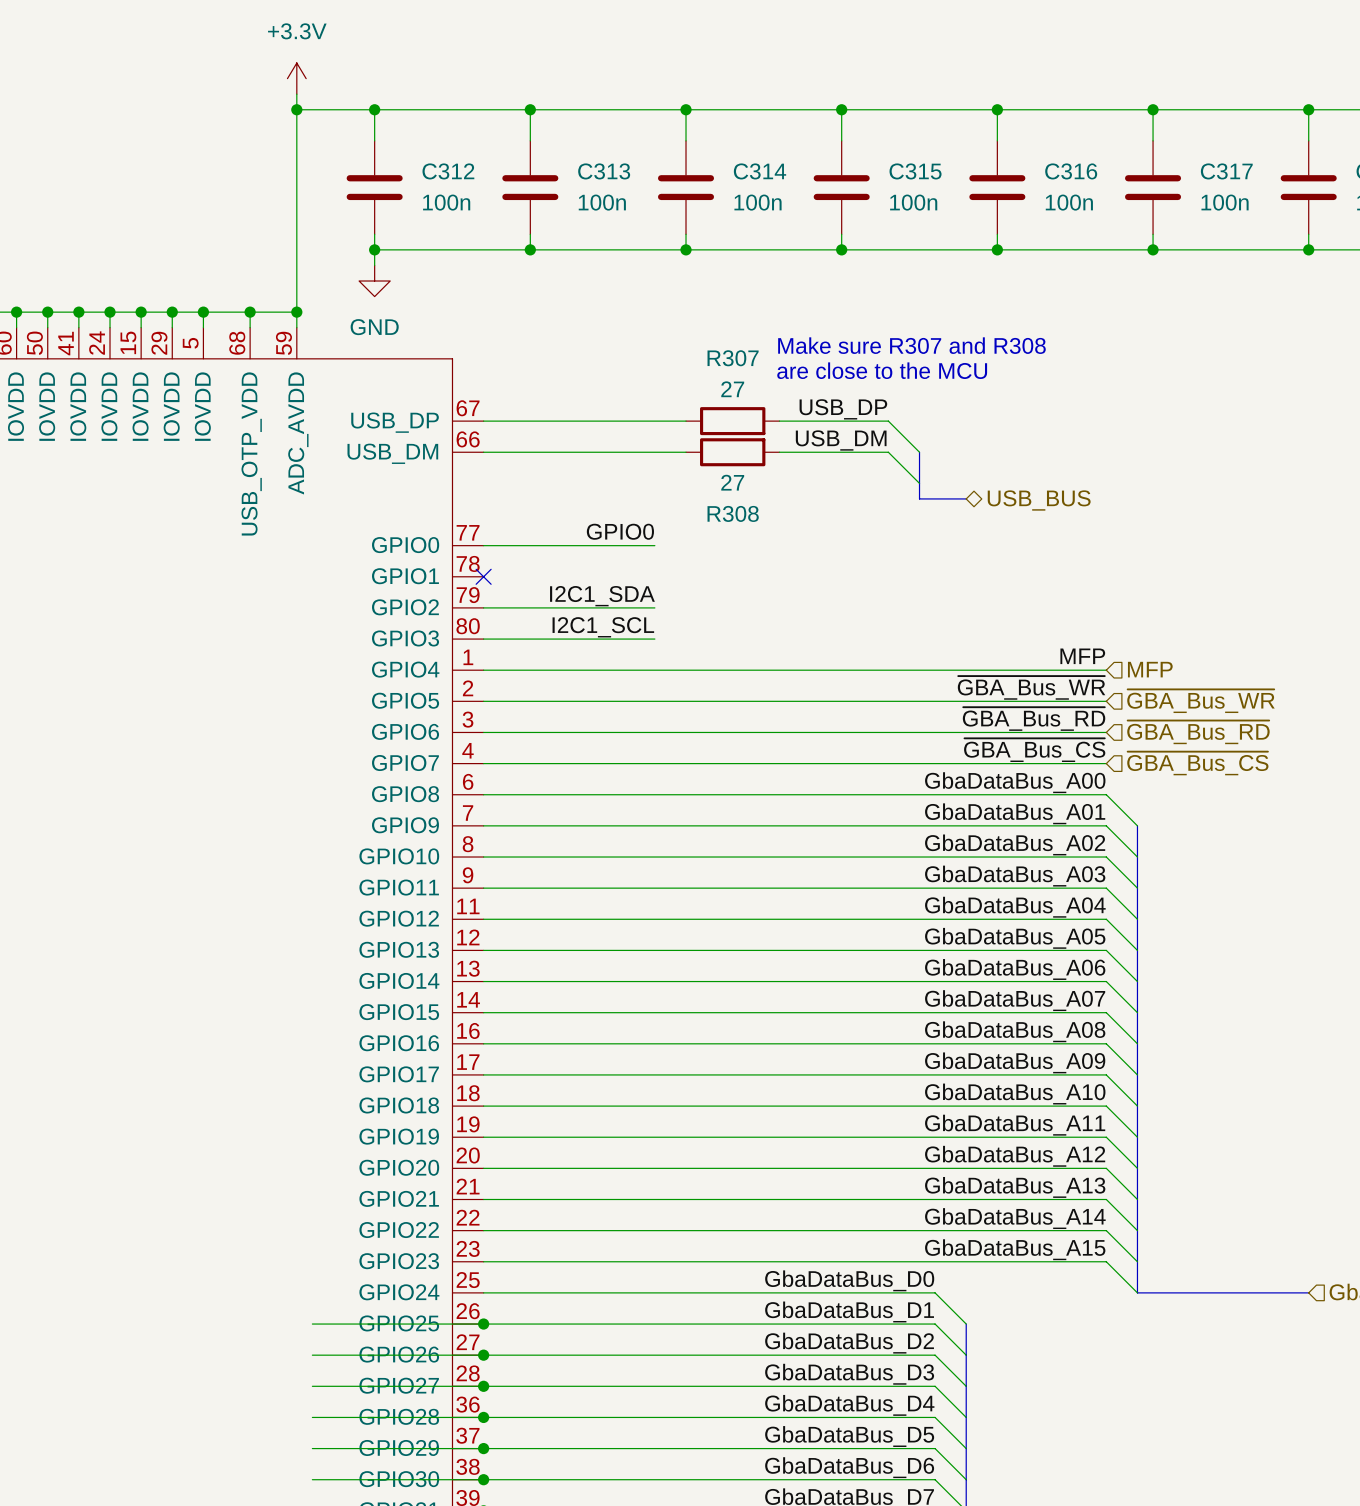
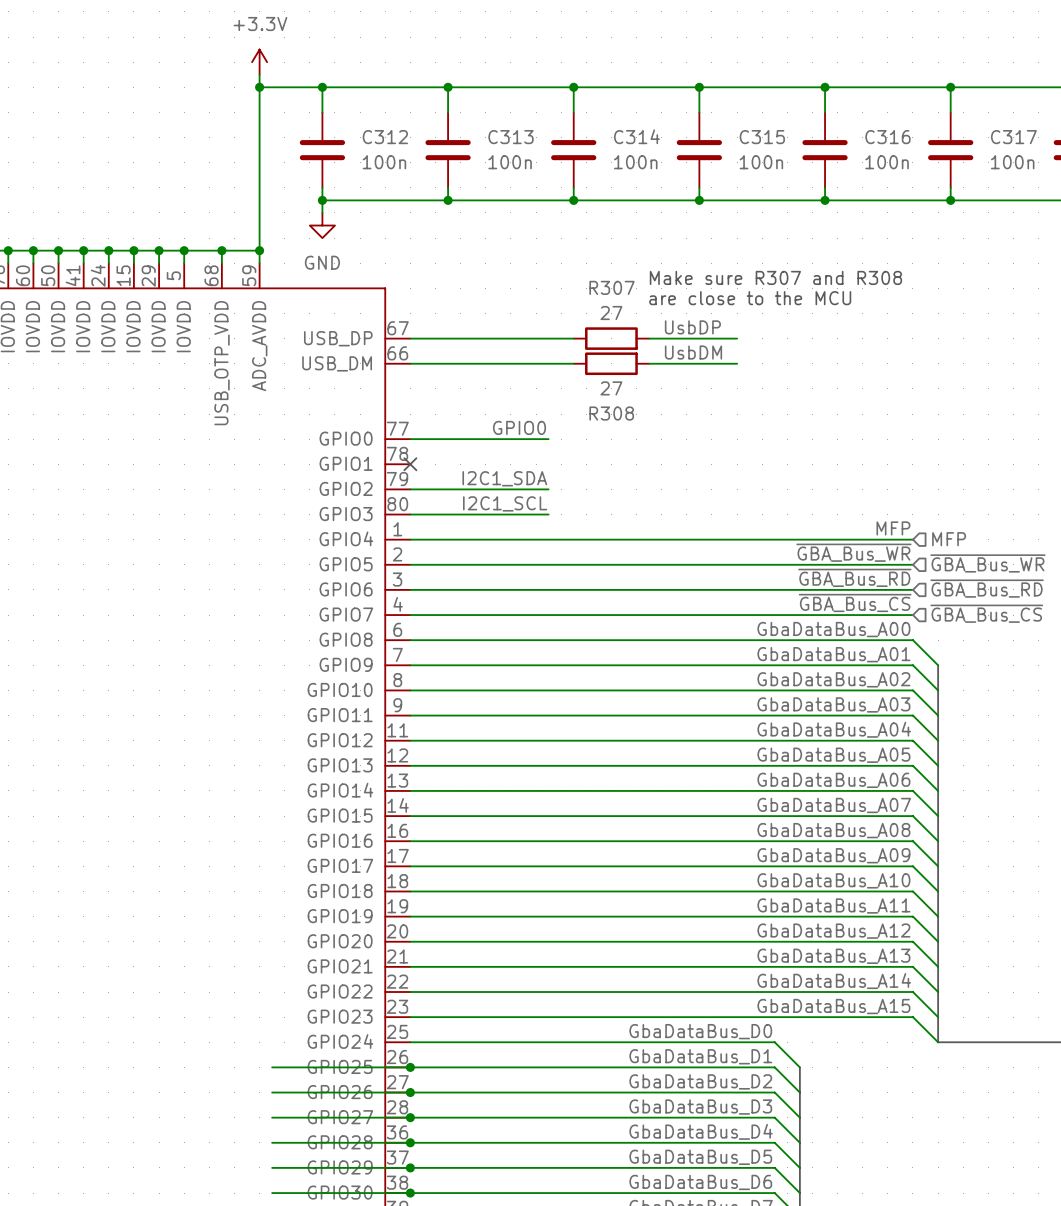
label: none -> UsbDP (692, 327)
label: USB_DP (843, 409) -> none
wire: (888, 421) (919, 452) -> none
label: none -> UsbDM (693, 352)
label: USB_DM (841, 440) -> none
wire: (888, 452) (919, 483) -> none
bus: (919, 452) (919, 498) (966, 498) -> none
hierarchical label: USB_BUS (1039, 500) -> none

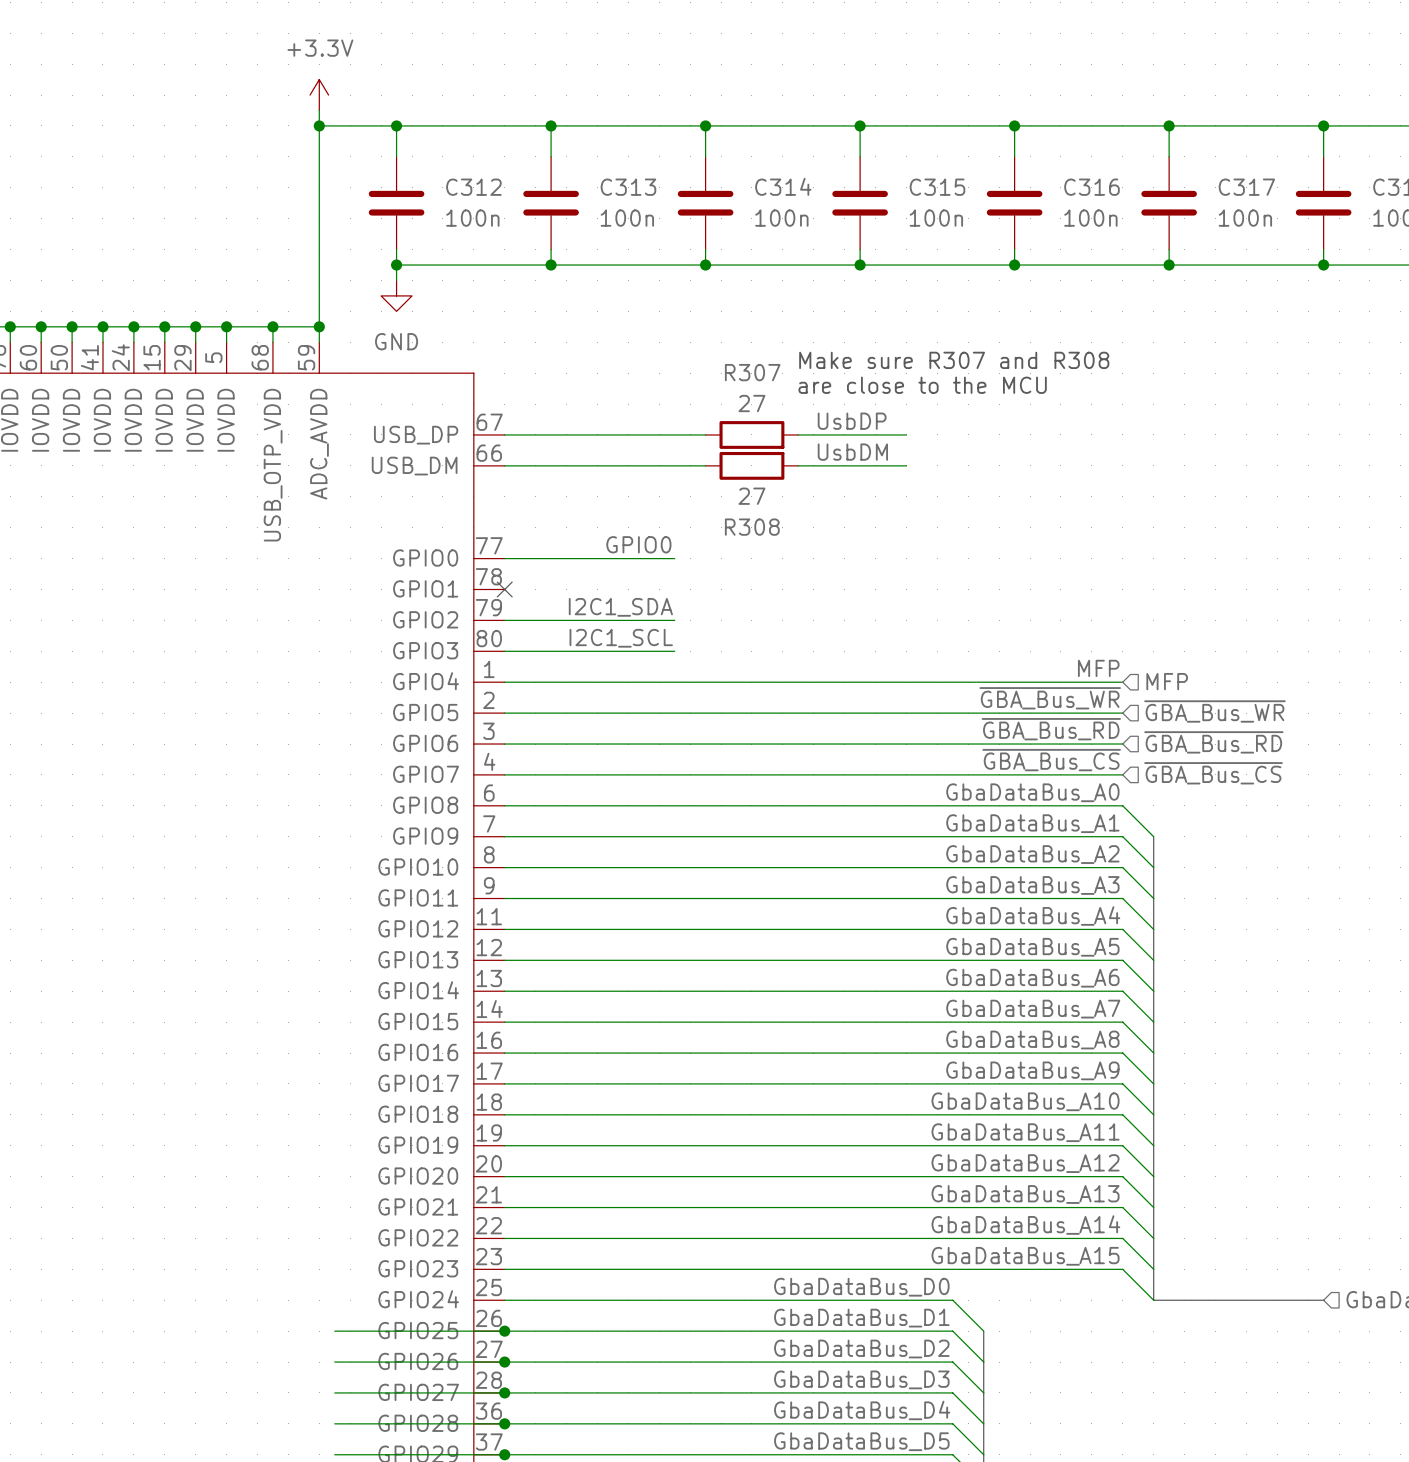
label: GbaDataBus_A00 (833, 629) -> GbaDataBus_A0 (1032, 792)
label: GbaDataBus_A01 (833, 654) -> GbaDataBus_A1 (1032, 823)
label: GbaDataBus_A02 (833, 679) -> GbaDataBus_A2 (1032, 854)
label: GbaDataBus_A03 (833, 704) -> GbaDataBus_A3 (1032, 885)
label: GbaDataBus_A04 (834, 729) -> GbaDataBus_A4 (1033, 916)
label: GbaDataBus_A05 (833, 755) -> GbaDataBus_A5 (1032, 947)
label: GbaDataBus_A06 (833, 780) -> GbaDataBus_A6 (1032, 978)
label: GbaDataBus_A07 (834, 805) -> GbaDataBus_A7 (1033, 1009)
label: GbaDataBus_A08 (833, 830) -> GbaDataBus_A8 (1032, 1039)
label: GbaDataBus_A09 (833, 855) -> GbaDataBus_A9 (1032, 1070)

